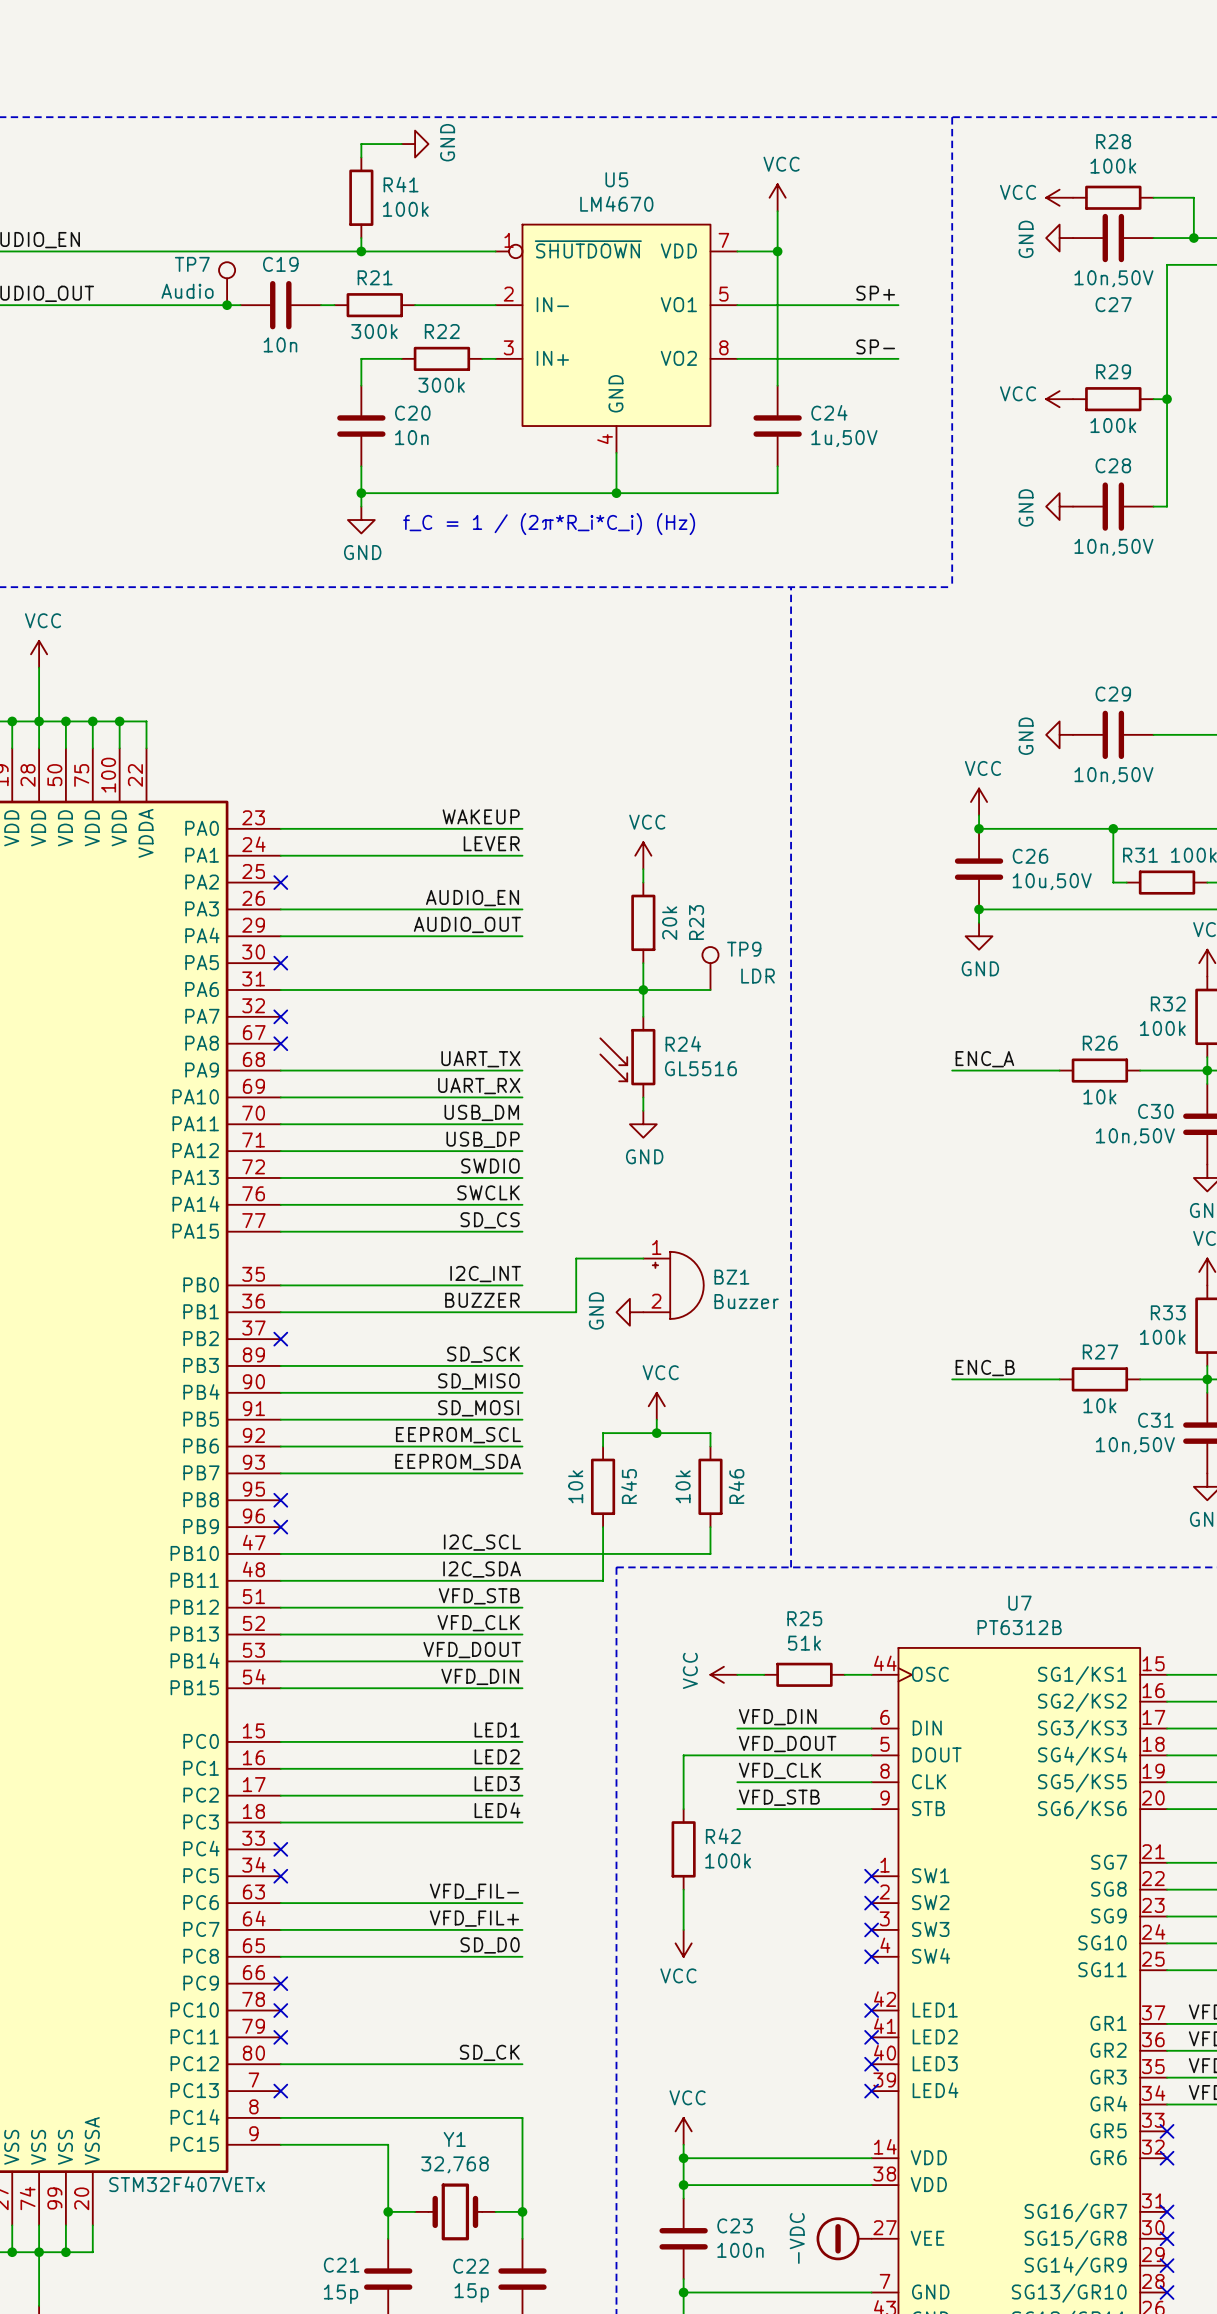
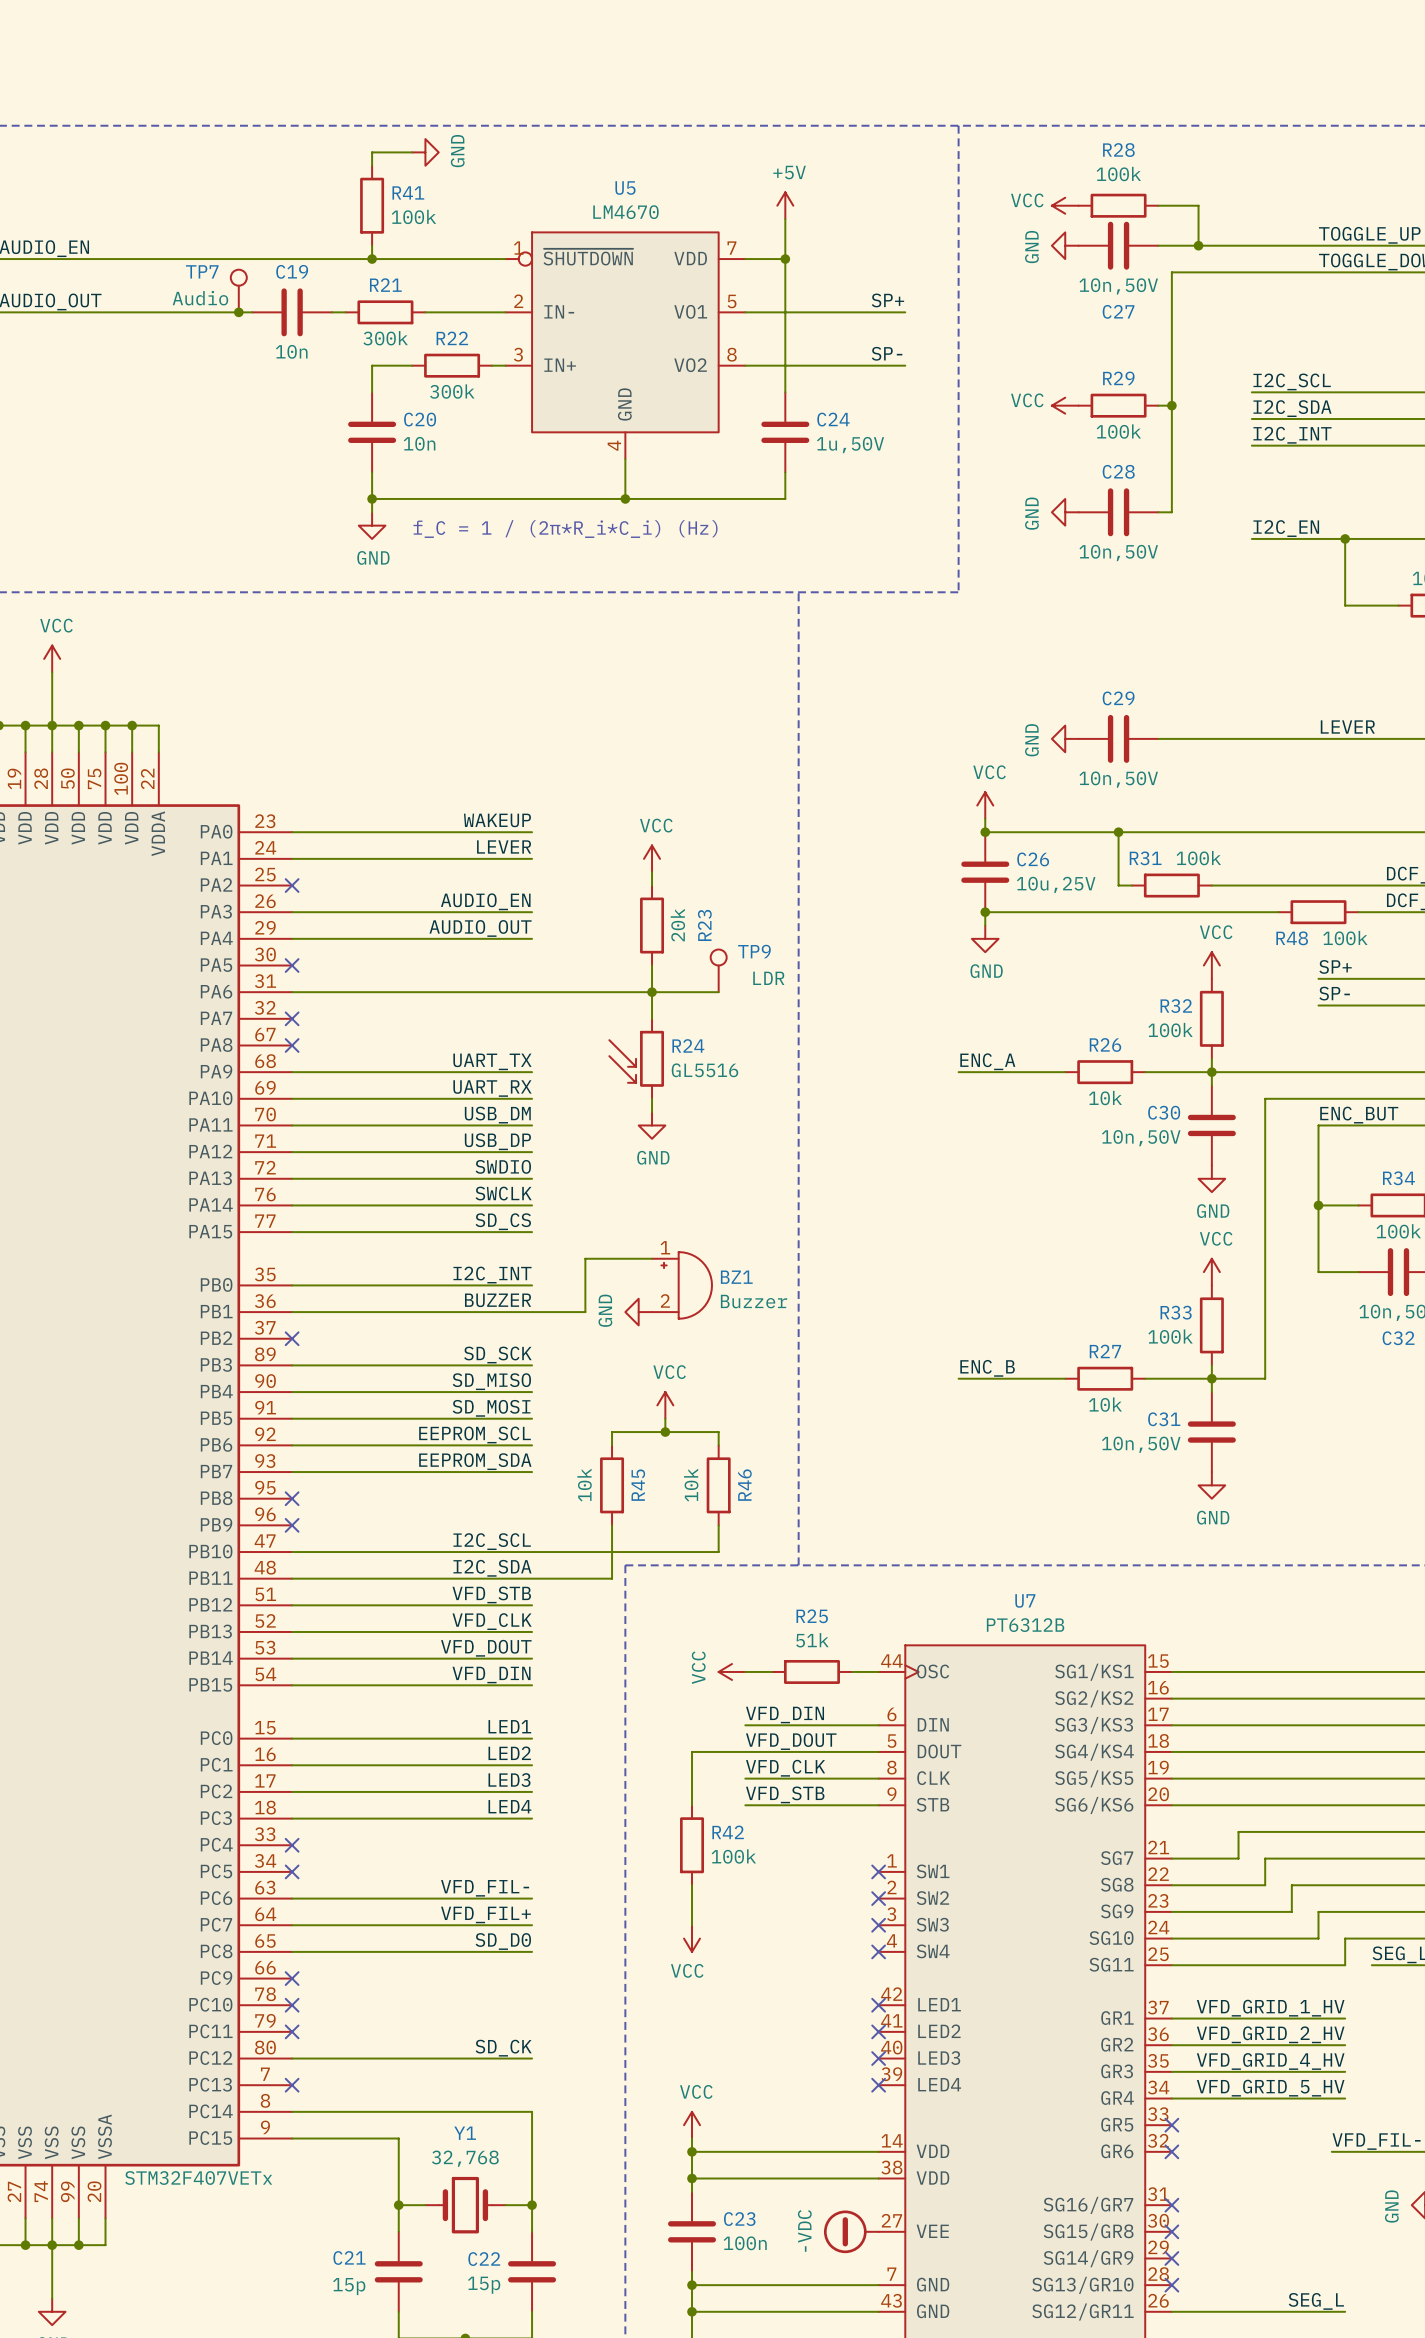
power symbol: VCC (777, 197) -> +5V (785, 205)
C26 value: 10u,50V (1052, 881) -> 10u,25V (1056, 884)

